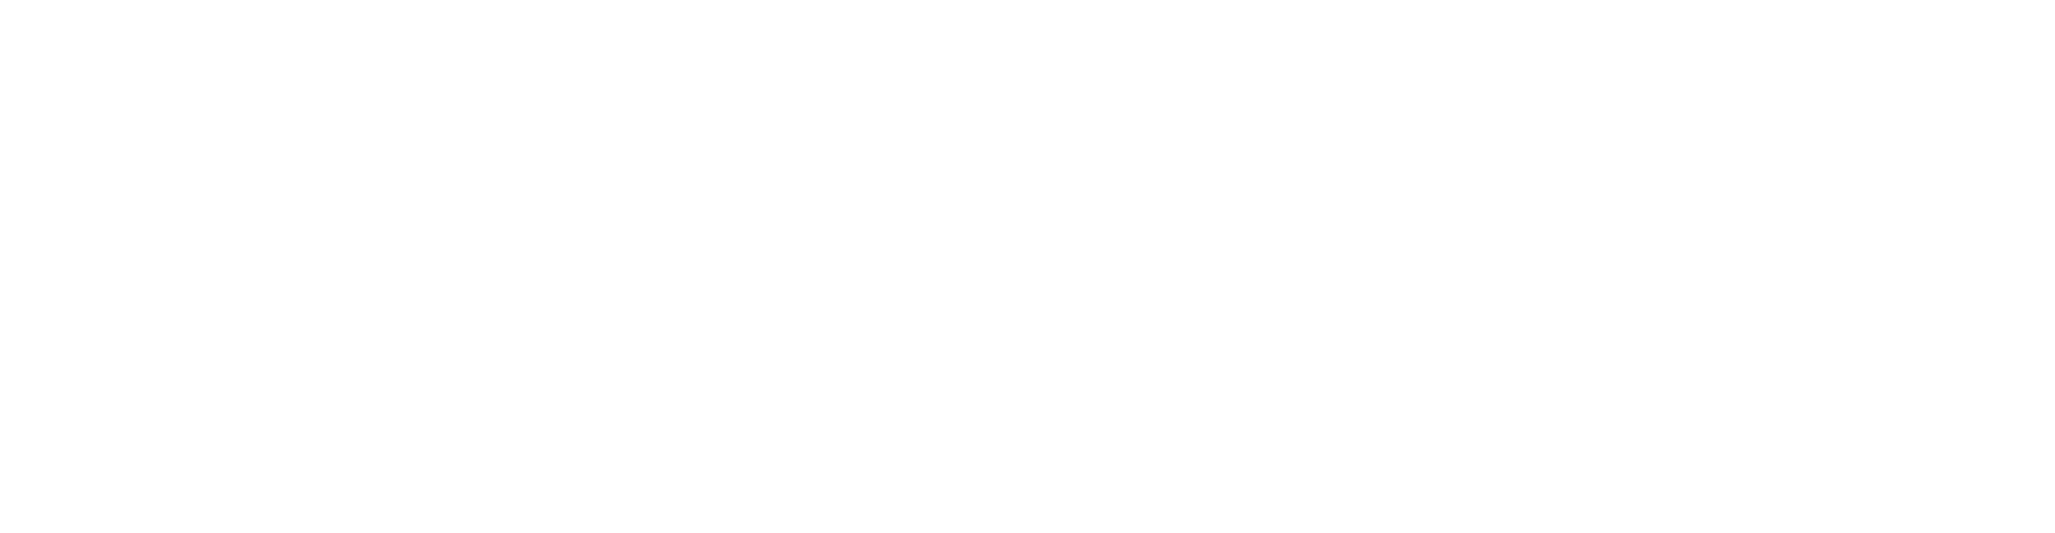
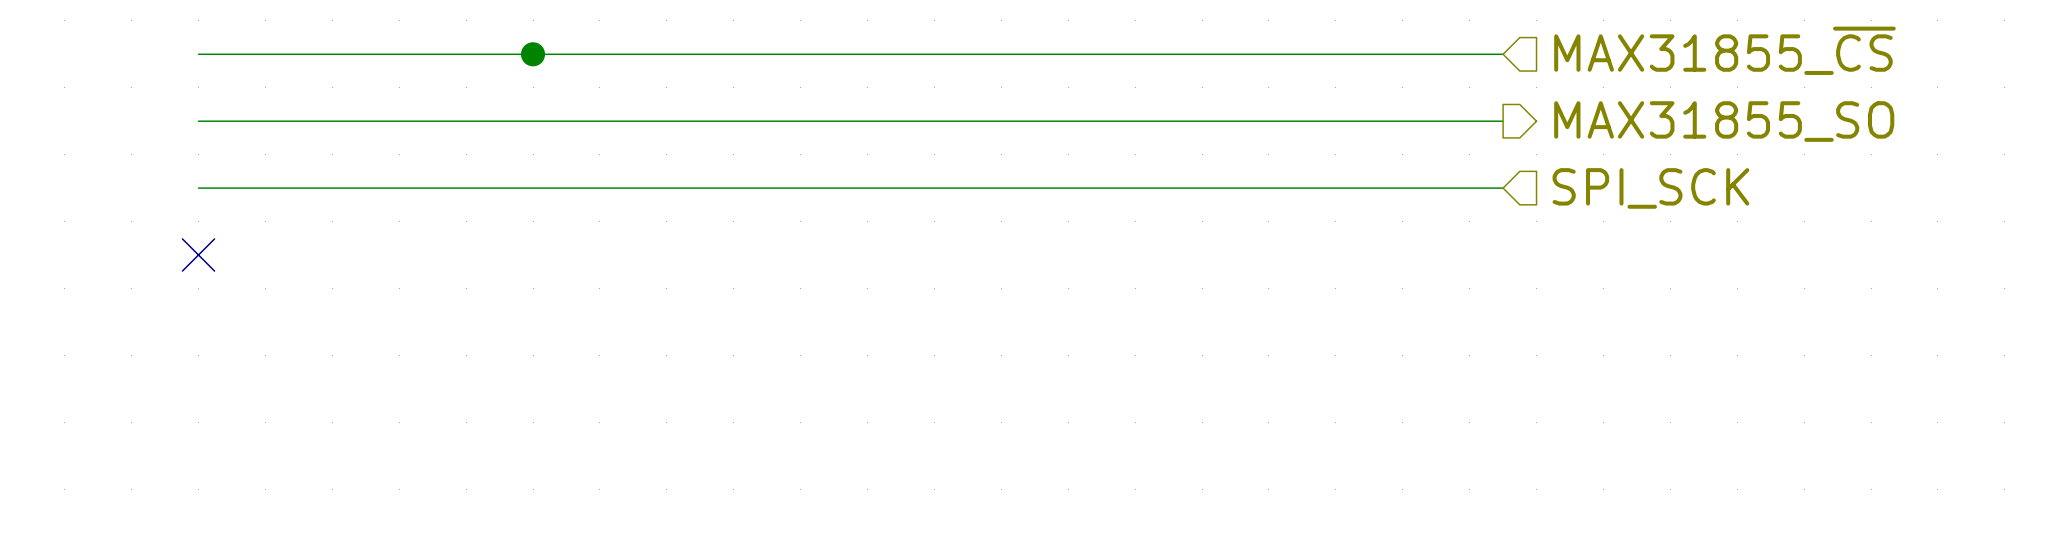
hierarchical label: none -> MAX31855_~{CS} (1724, 50)
wire: none -> (198, 54) (1503, 54)
junction: none -> (533, 54)
wire: none -> (198, 121) (1503, 121)
hierarchical label: none -> MAX31855_SO (1724, 121)
wire: none -> (198, 188) (1503, 188)
hierarchical label: none -> SPI_SCK (1650, 188)
no-connect mark: none -> (198, 255)

